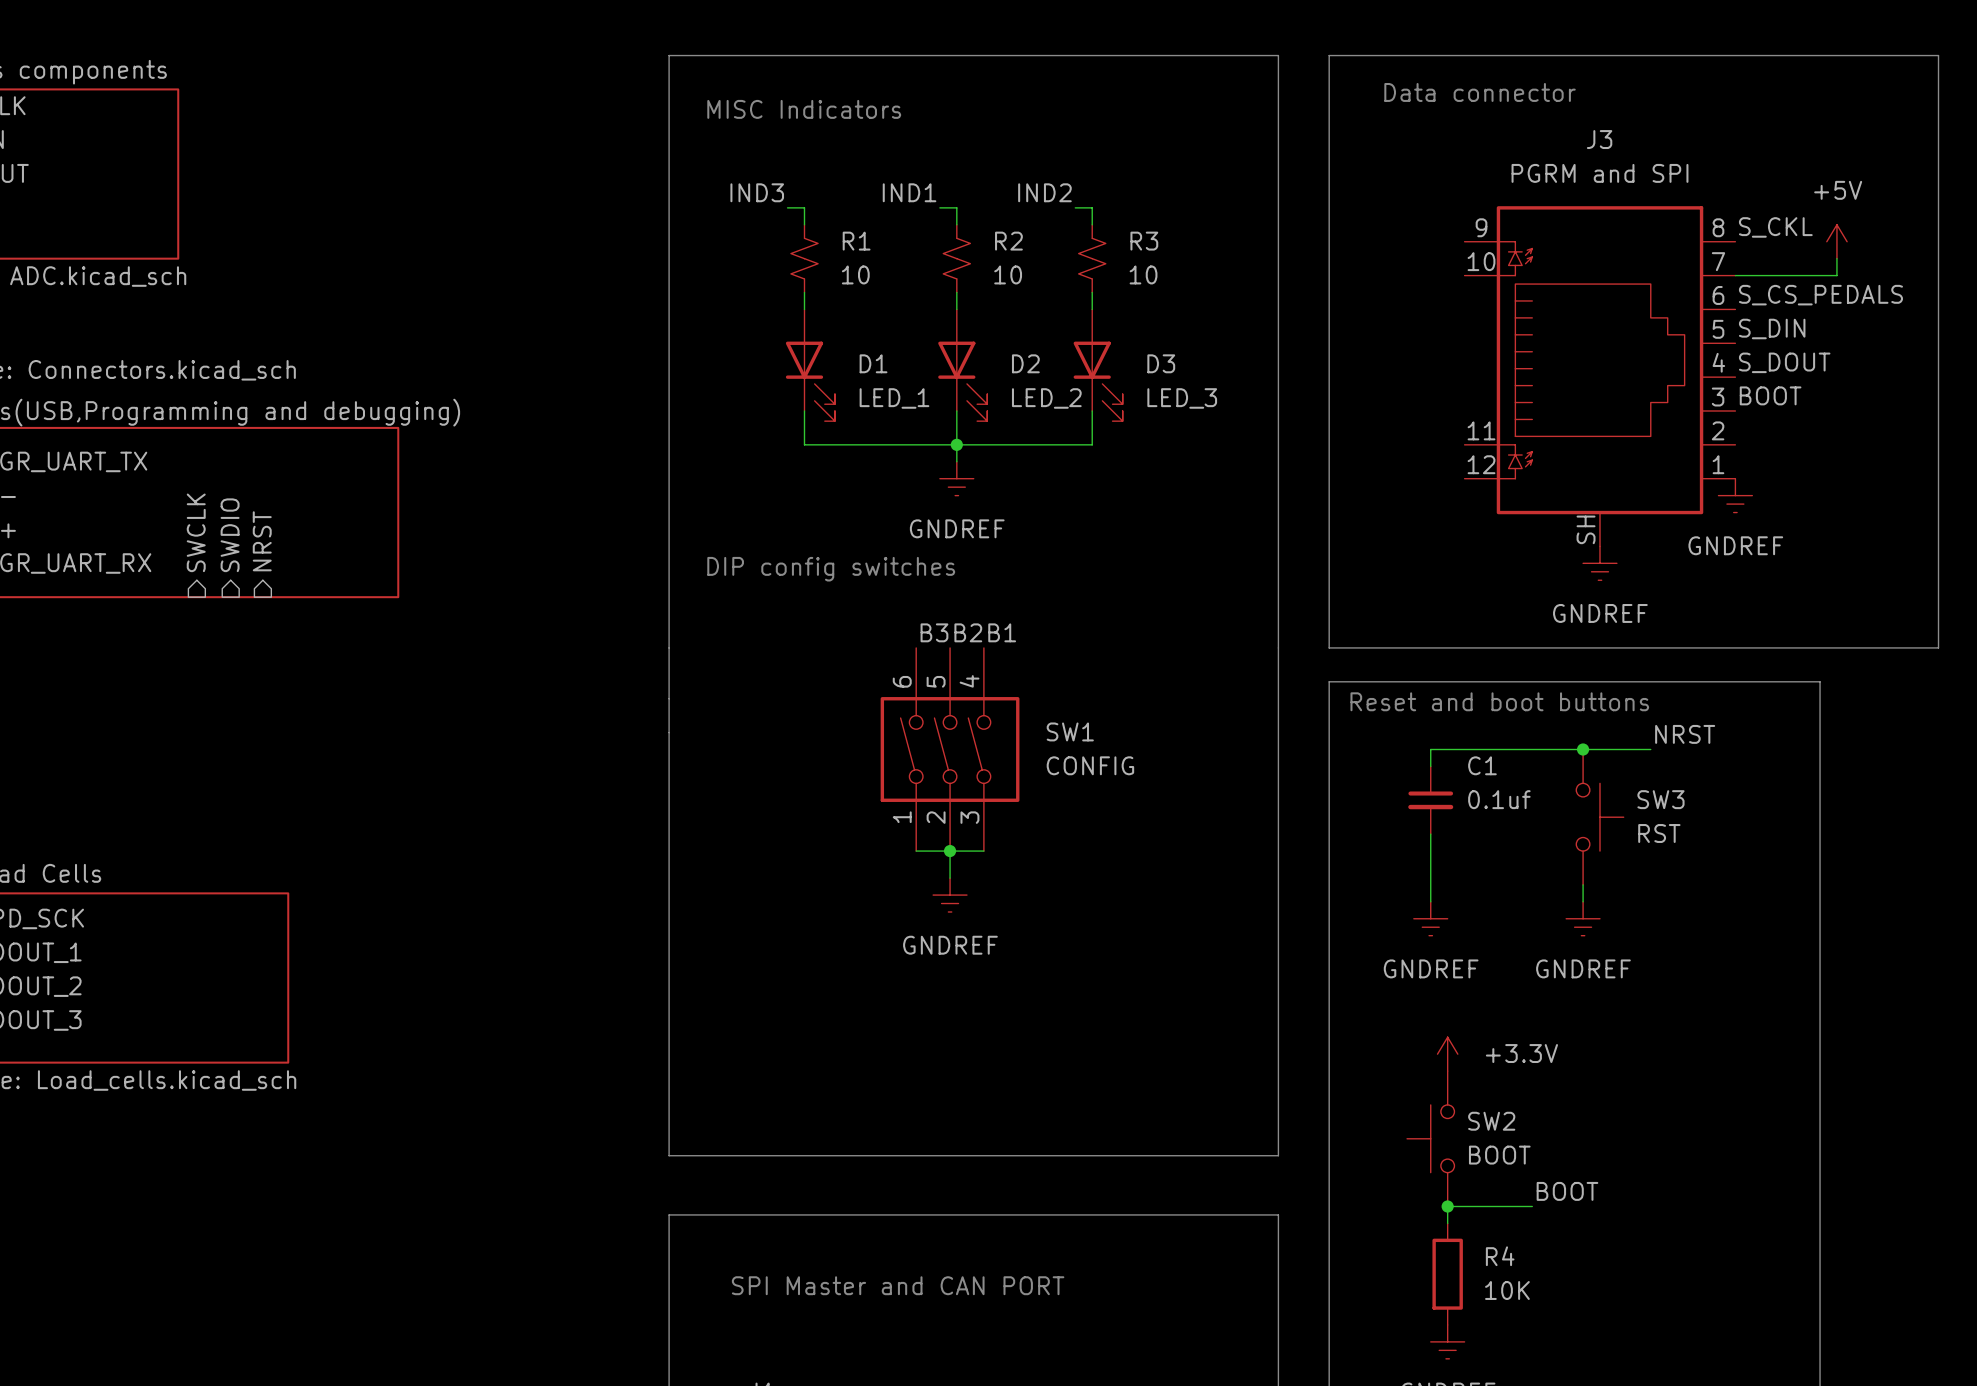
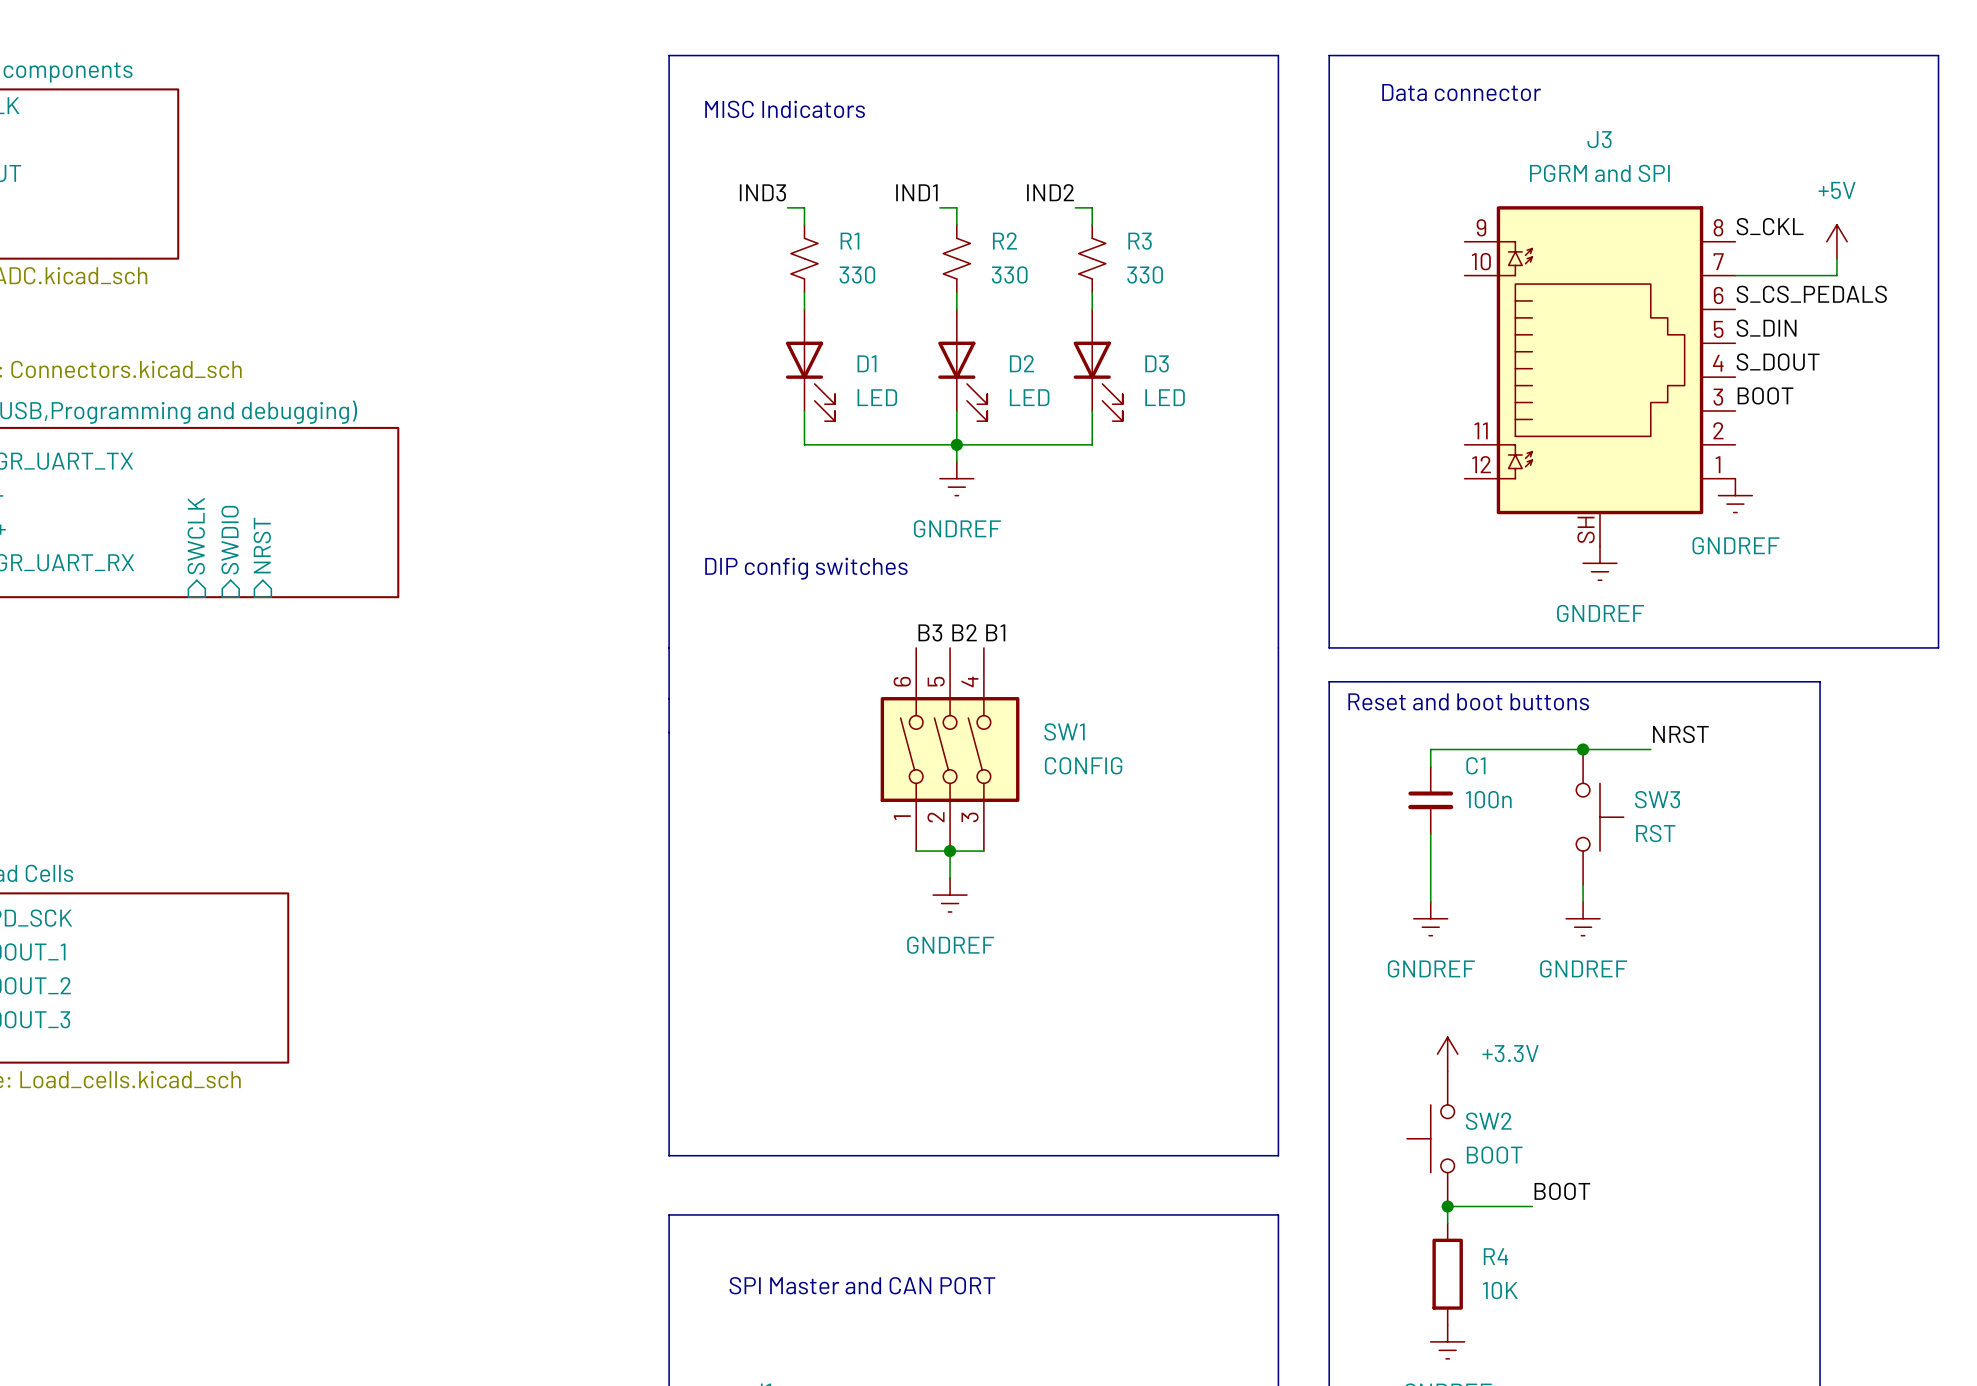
R1 value: 10 (855, 274) -> 330 (857, 274)
R2 value: 10 (1008, 274) -> 330 (1009, 274)
R3 value: 10 (1143, 274) -> 330 (1145, 274)
D1 value: LED_1 (894, 398) -> LED (877, 397)
D2 value: LED_2 (1046, 398) -> LED (1029, 397)
D3 value: LED_3 (1182, 398) -> LED (1165, 397)
C1 value: 0.1uf (1499, 799) -> 100n (1488, 799)

